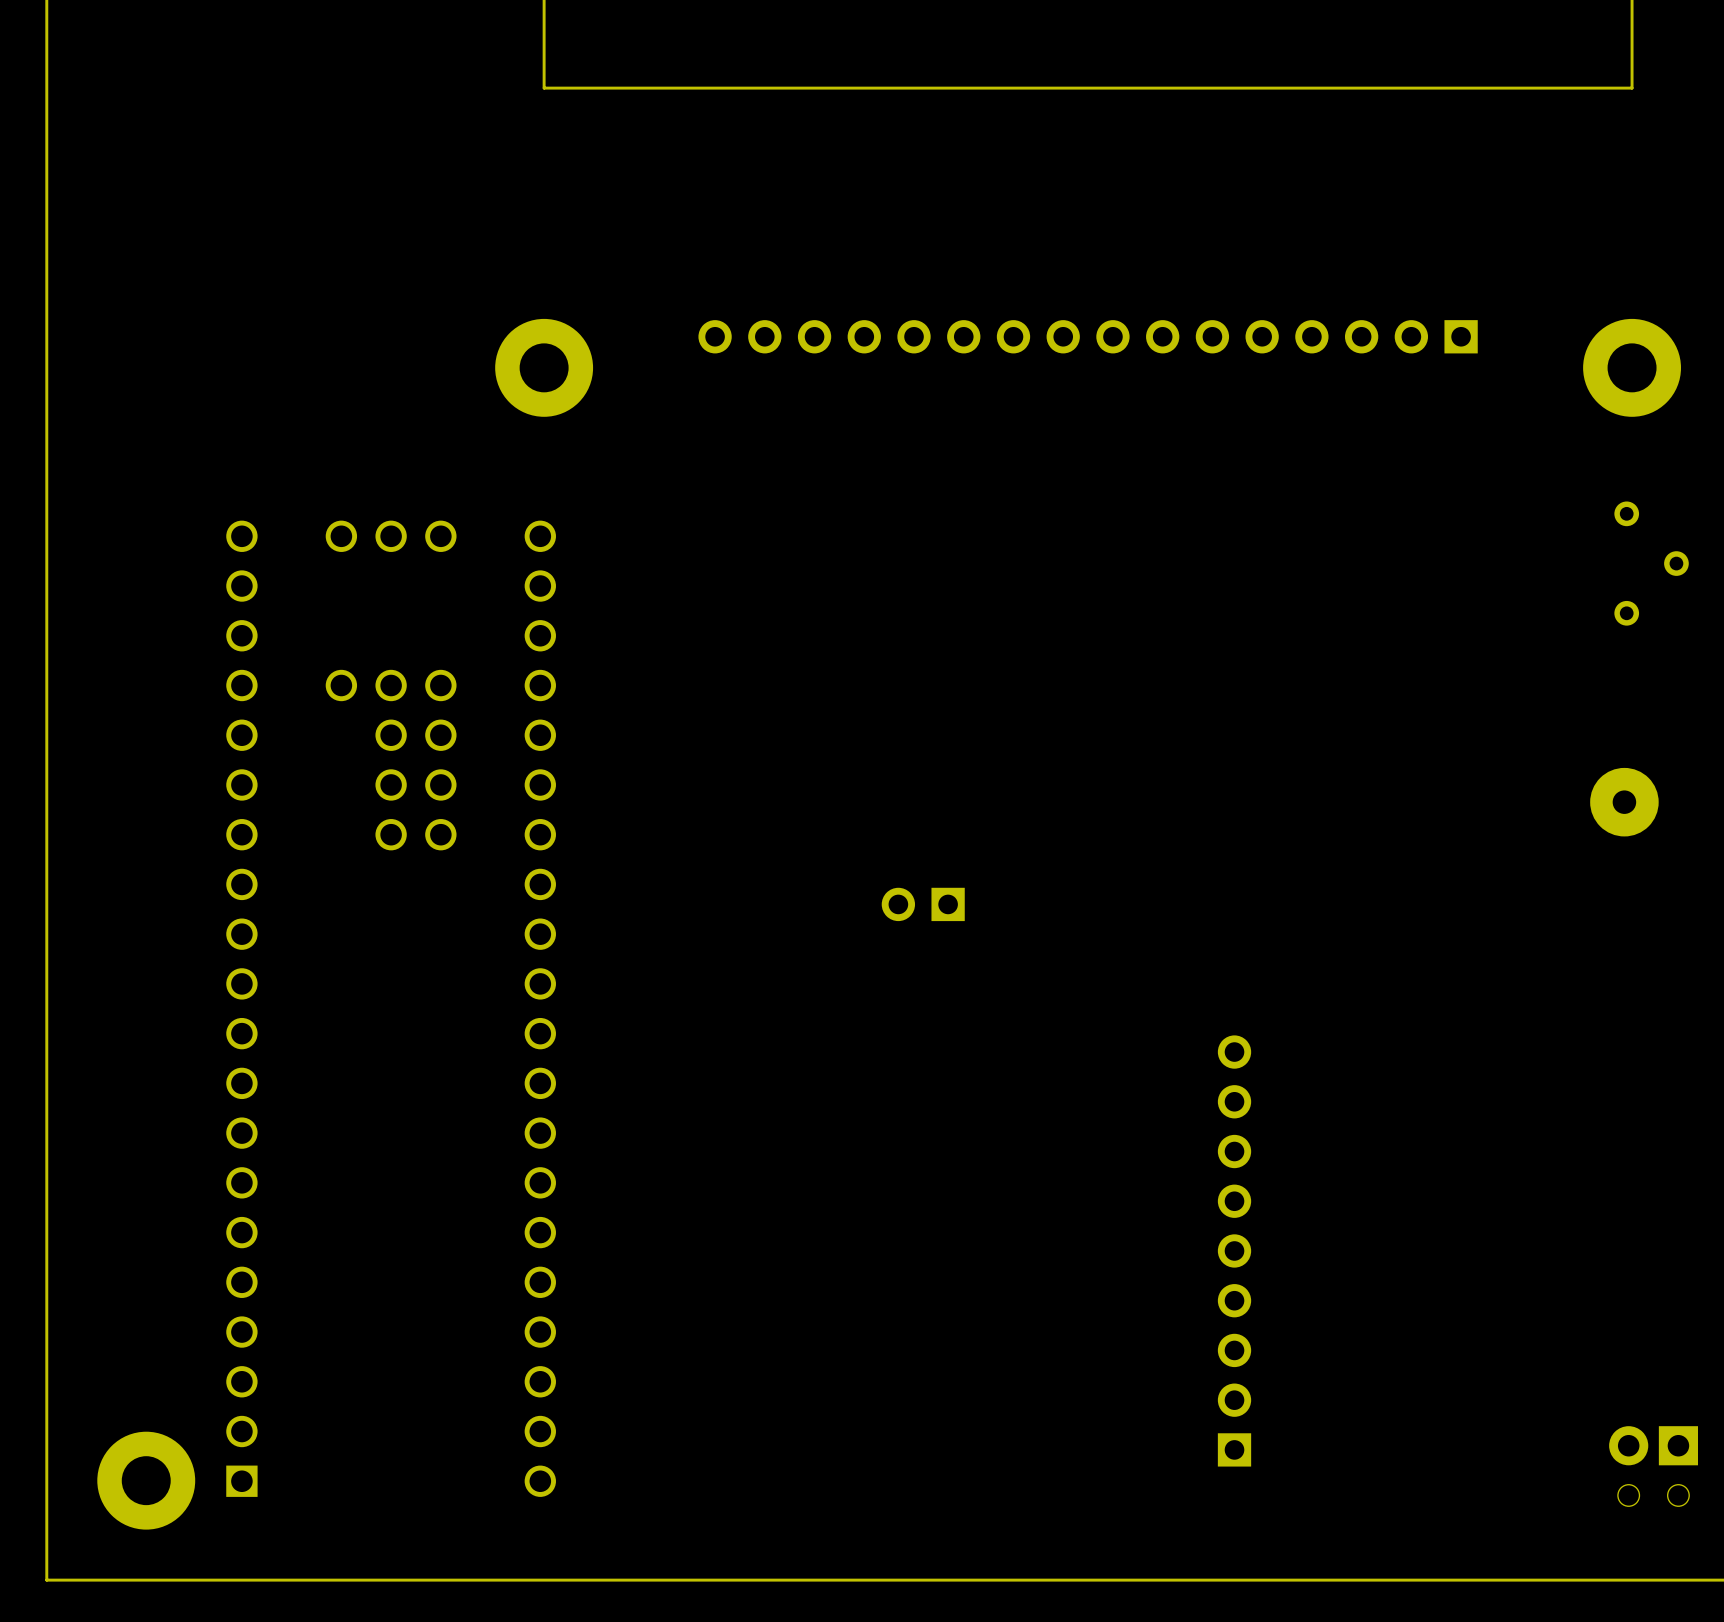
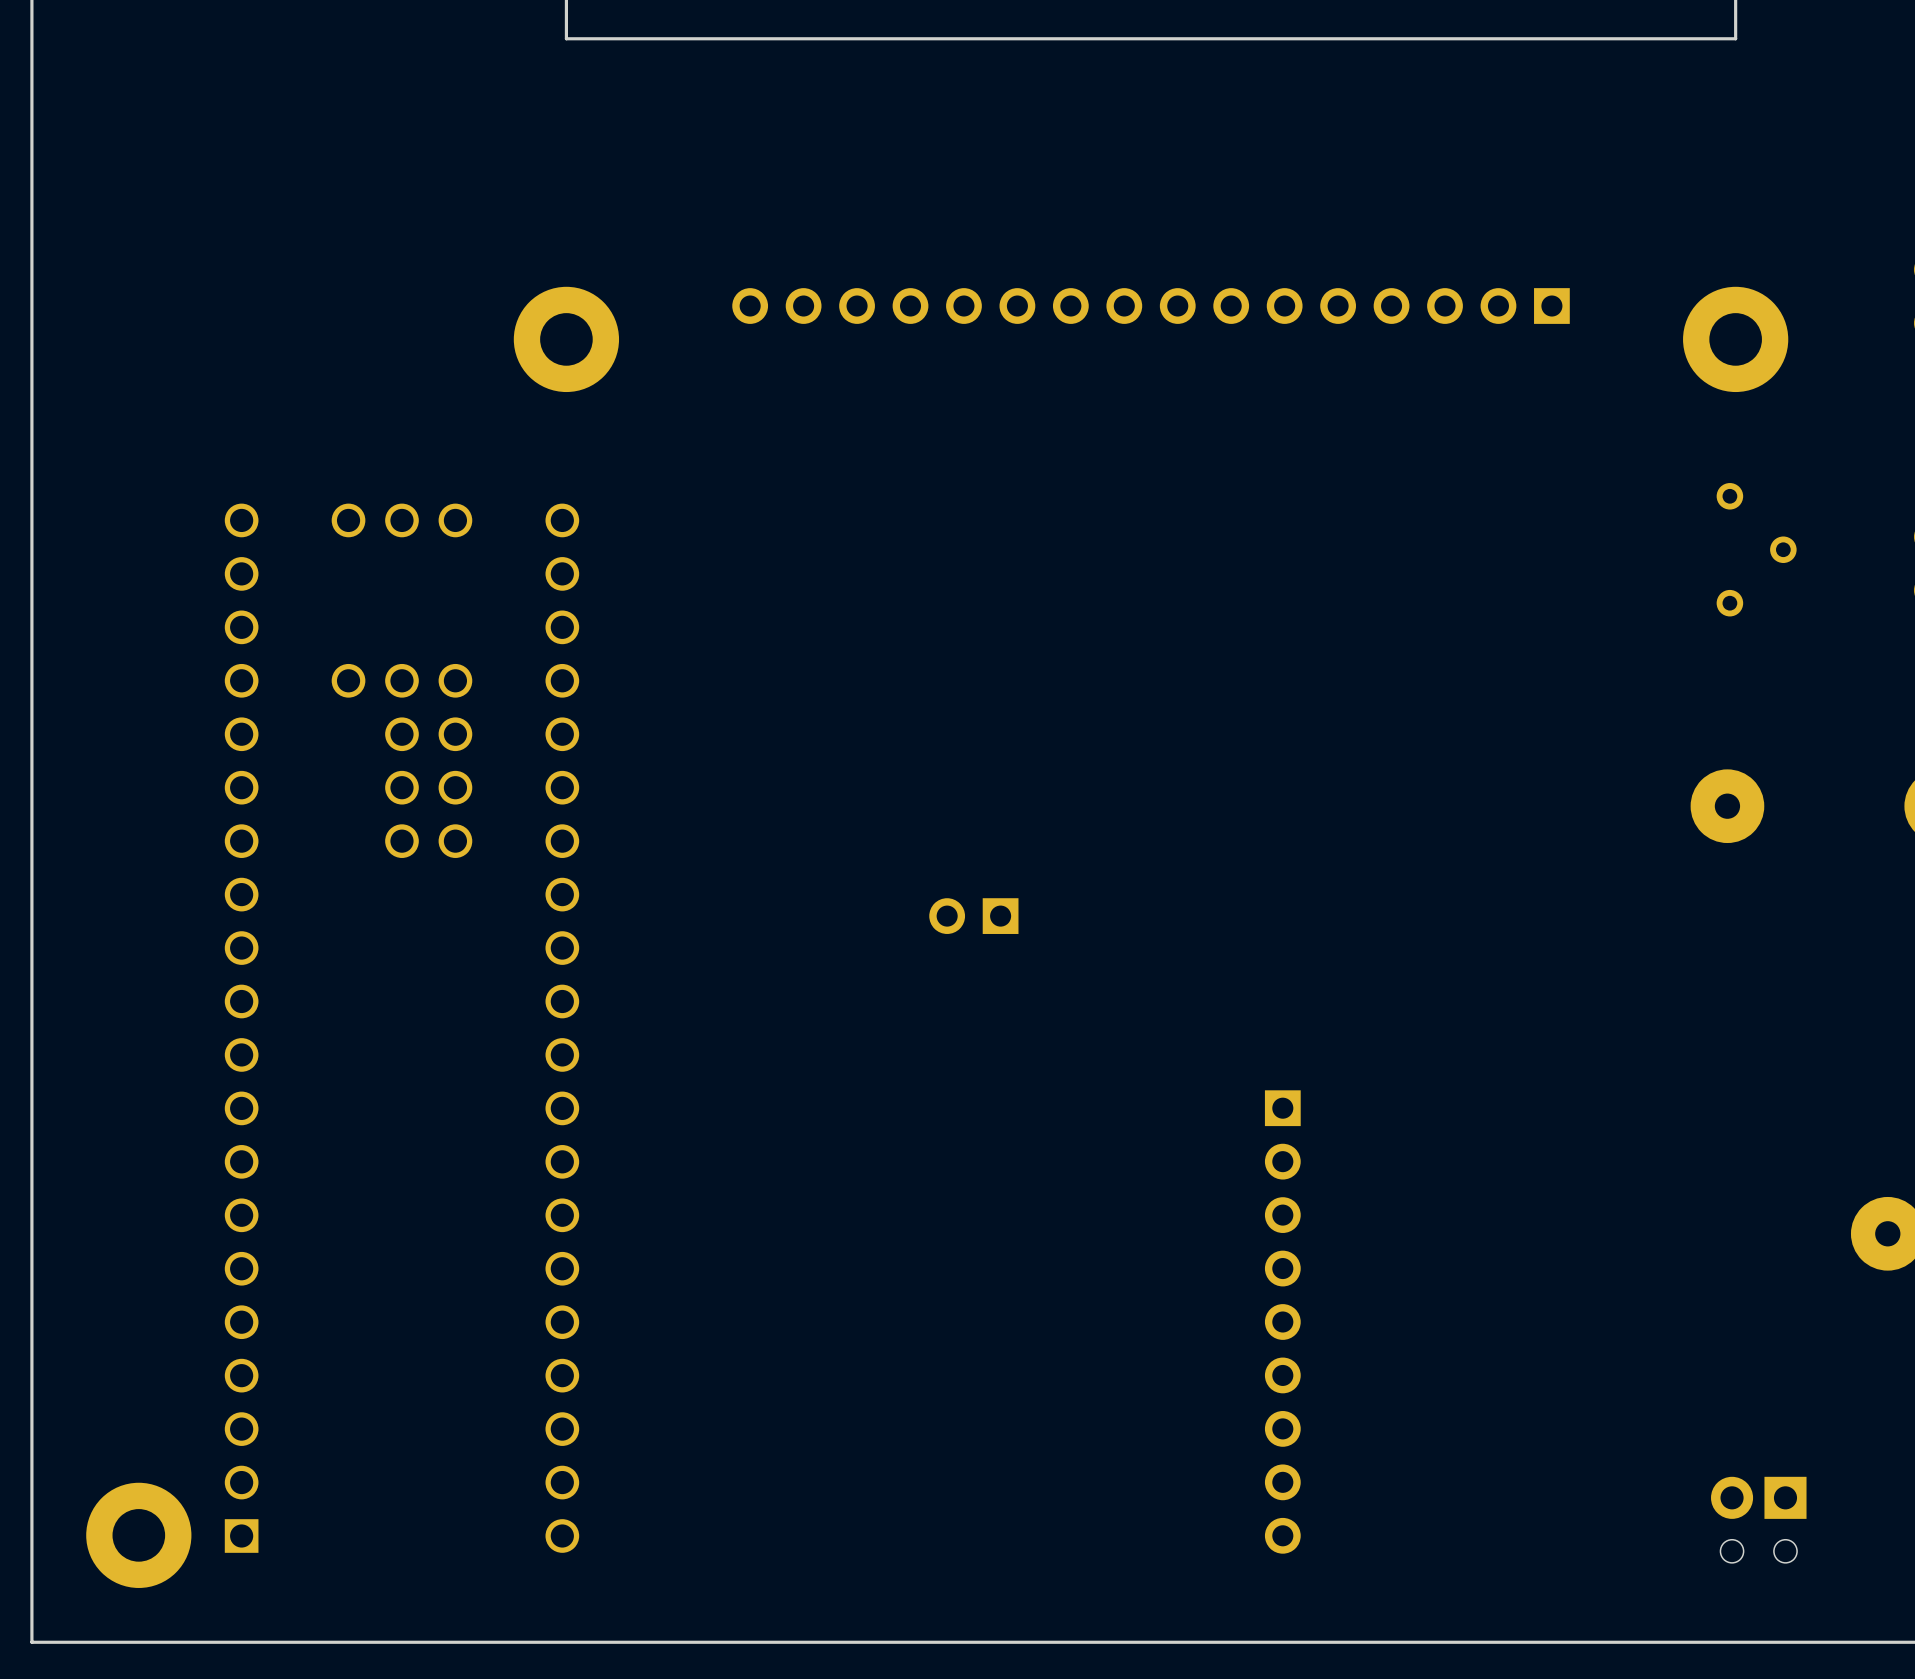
part rotation: 0° (1234, 1250) -> 180° (1282, 1321)

